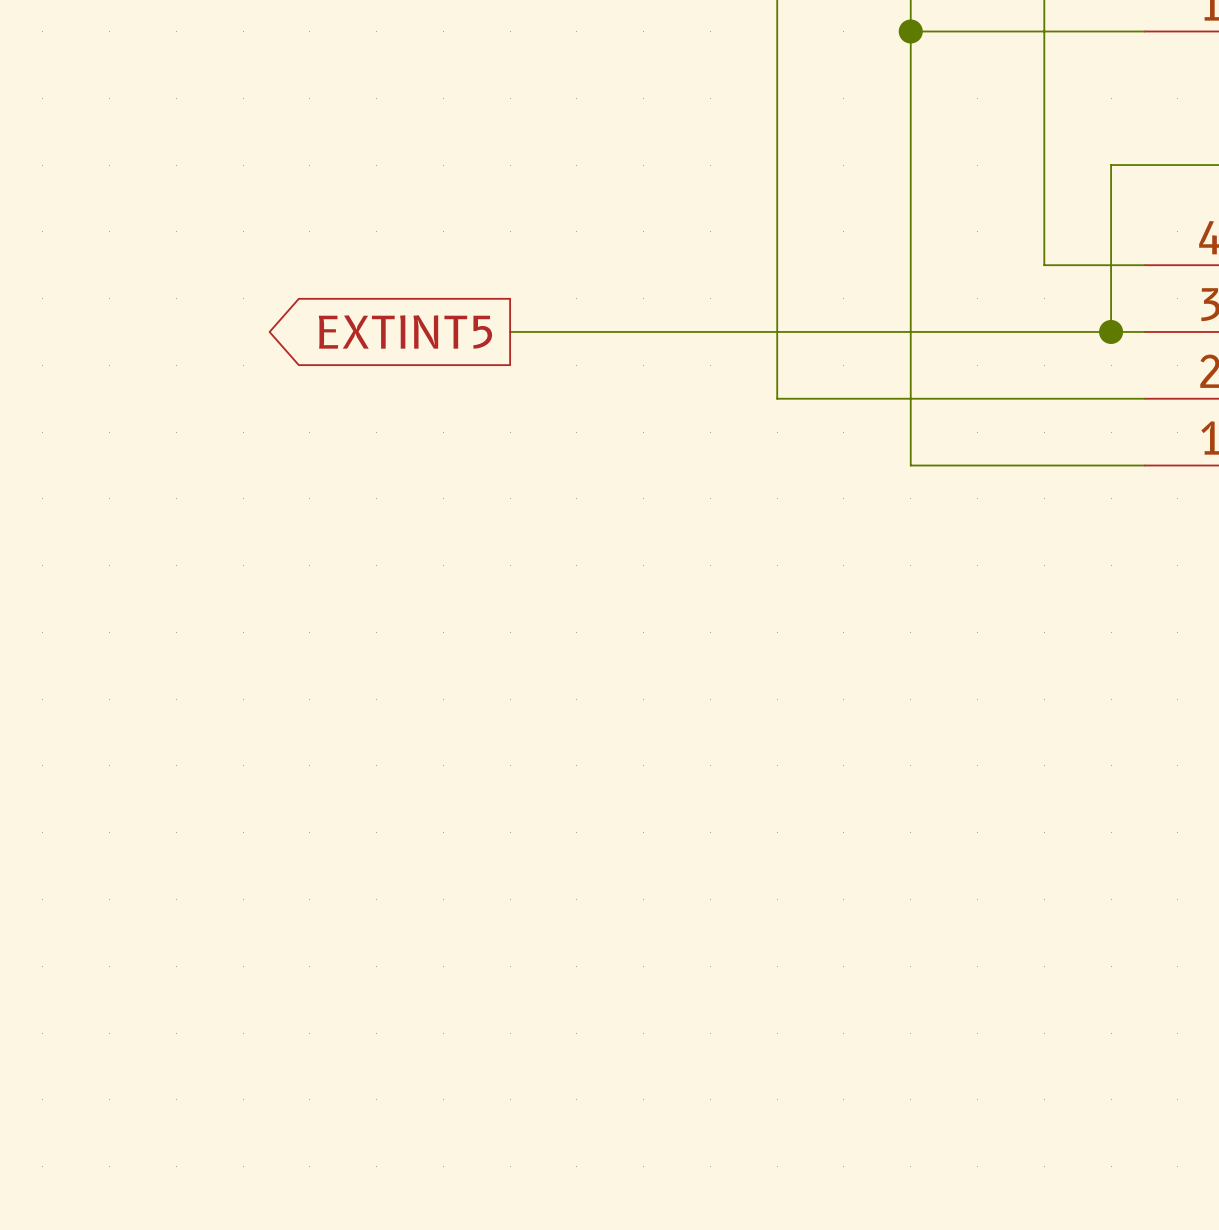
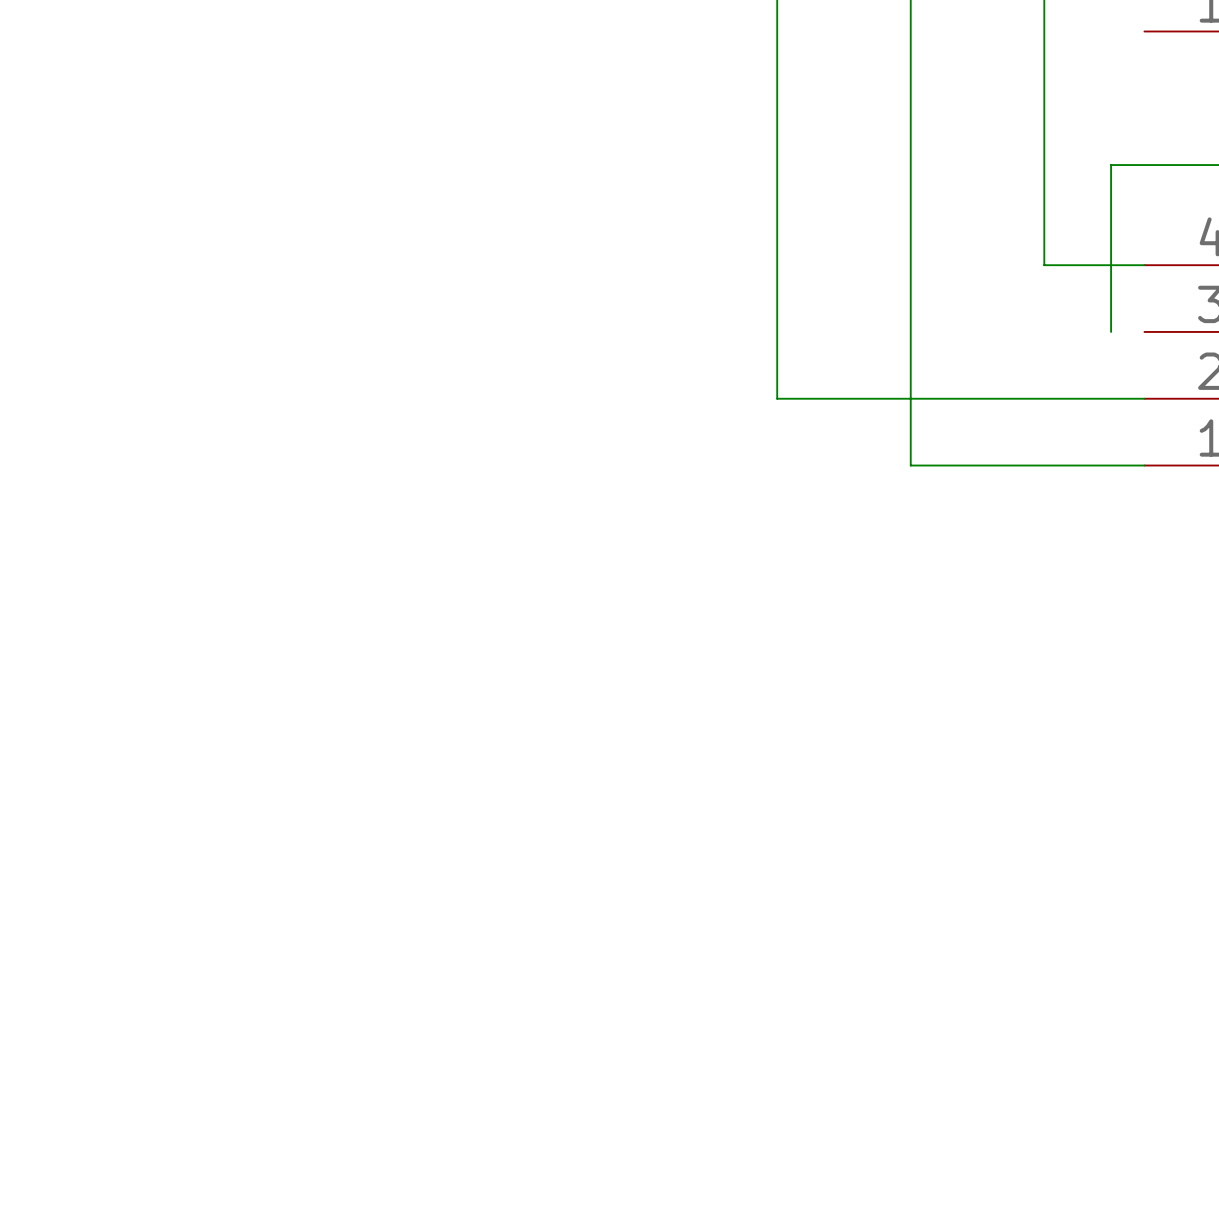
wire: (910, 31) (1144, 31) -> none
junction: (910, 31) -> none
global label: EXTINT5 (405, 331) -> none
wire: (510, 331) (1144, 331) -> none
junction: (1111, 331) -> none

